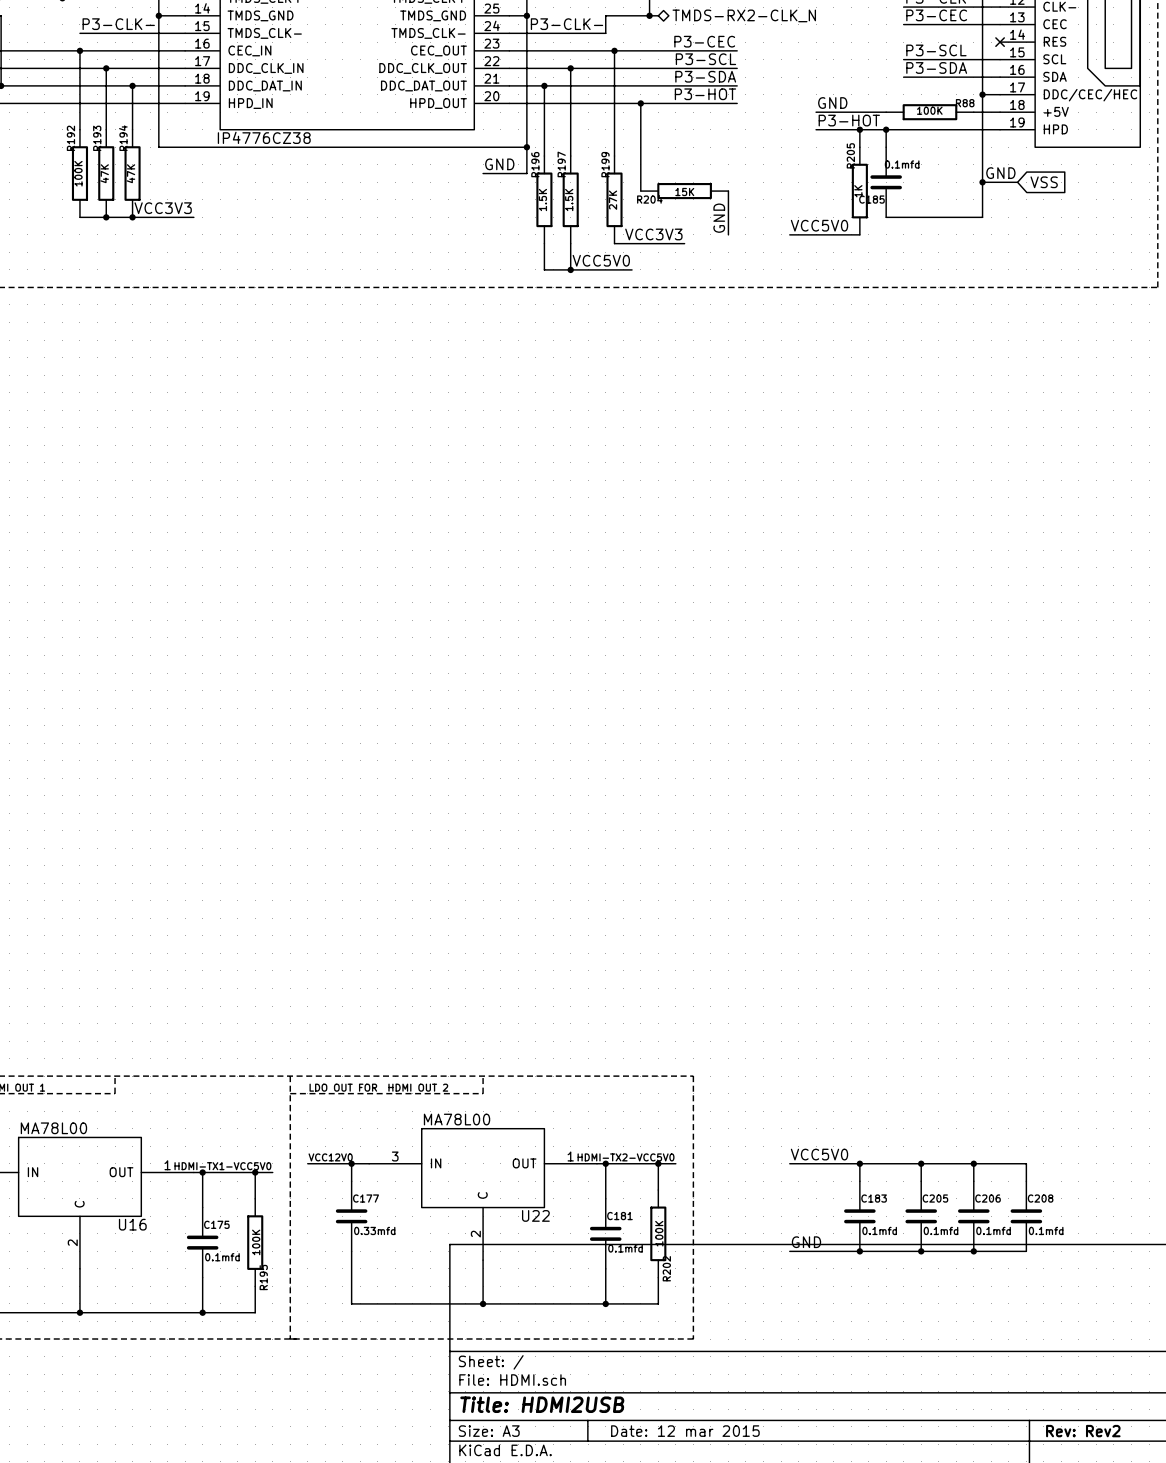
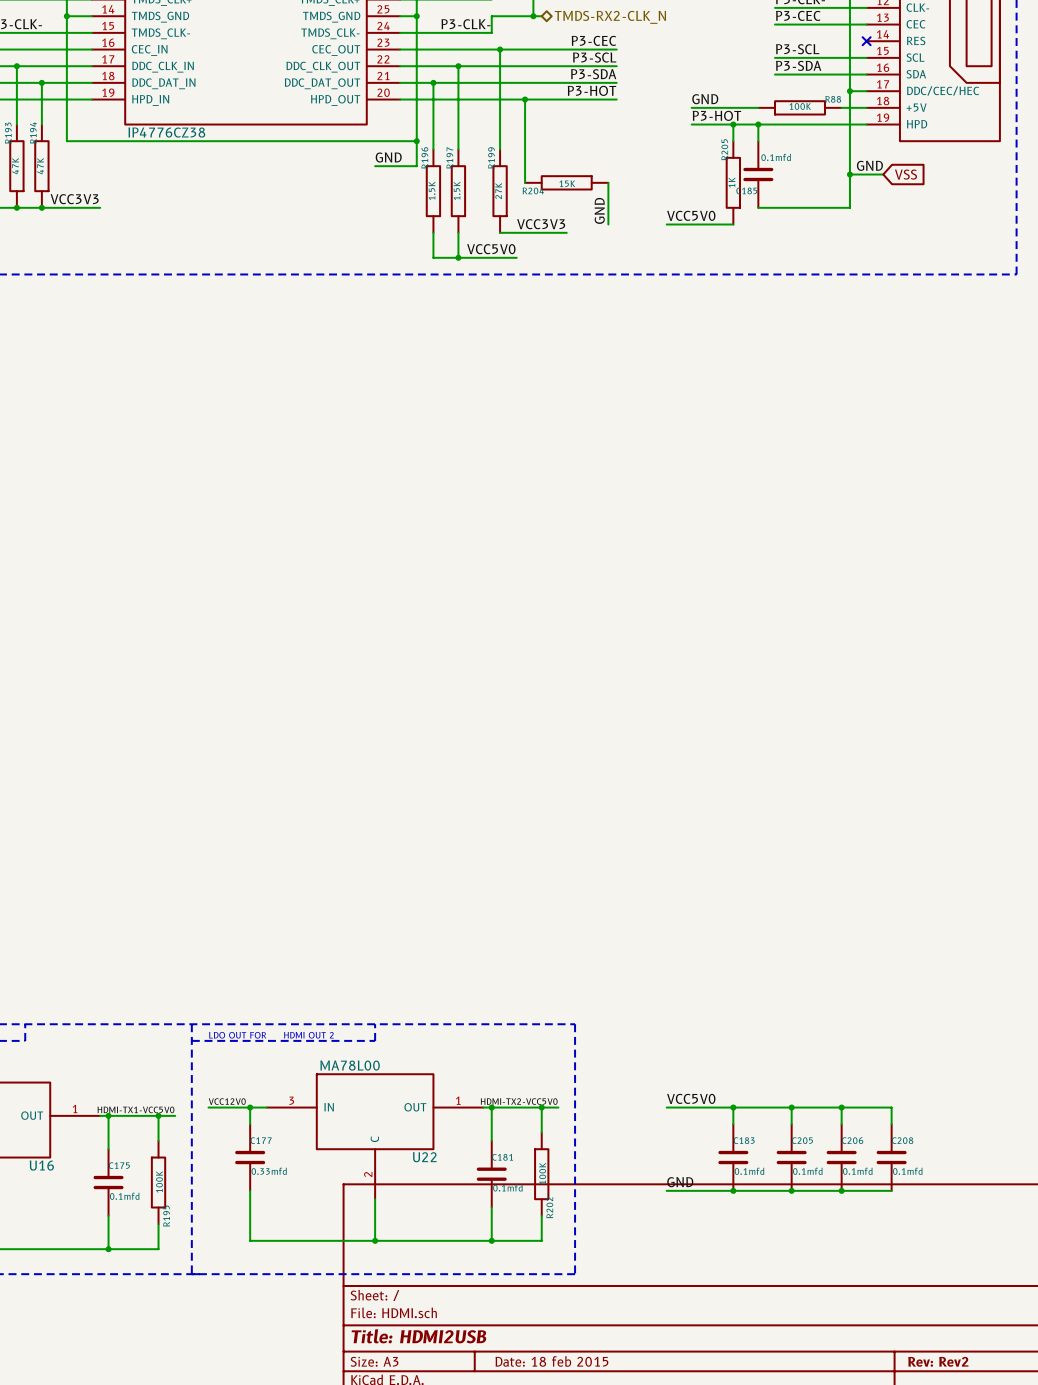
title block: Date: 12 mar 2015 (685, 1431) -> Date: 18 feb 2015 (551, 1361)

